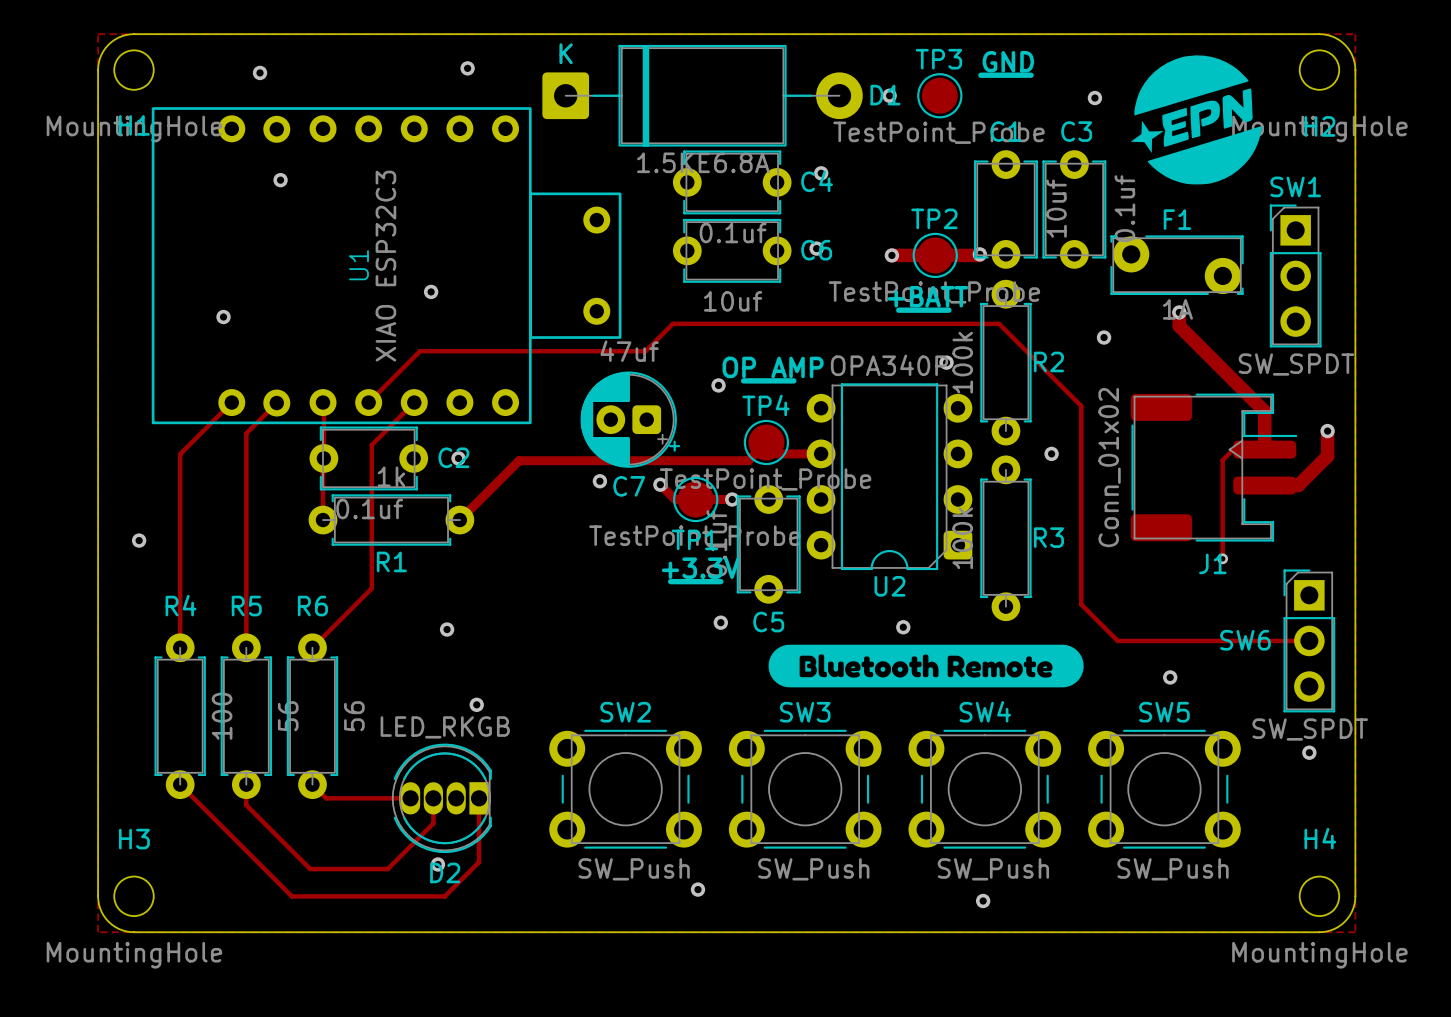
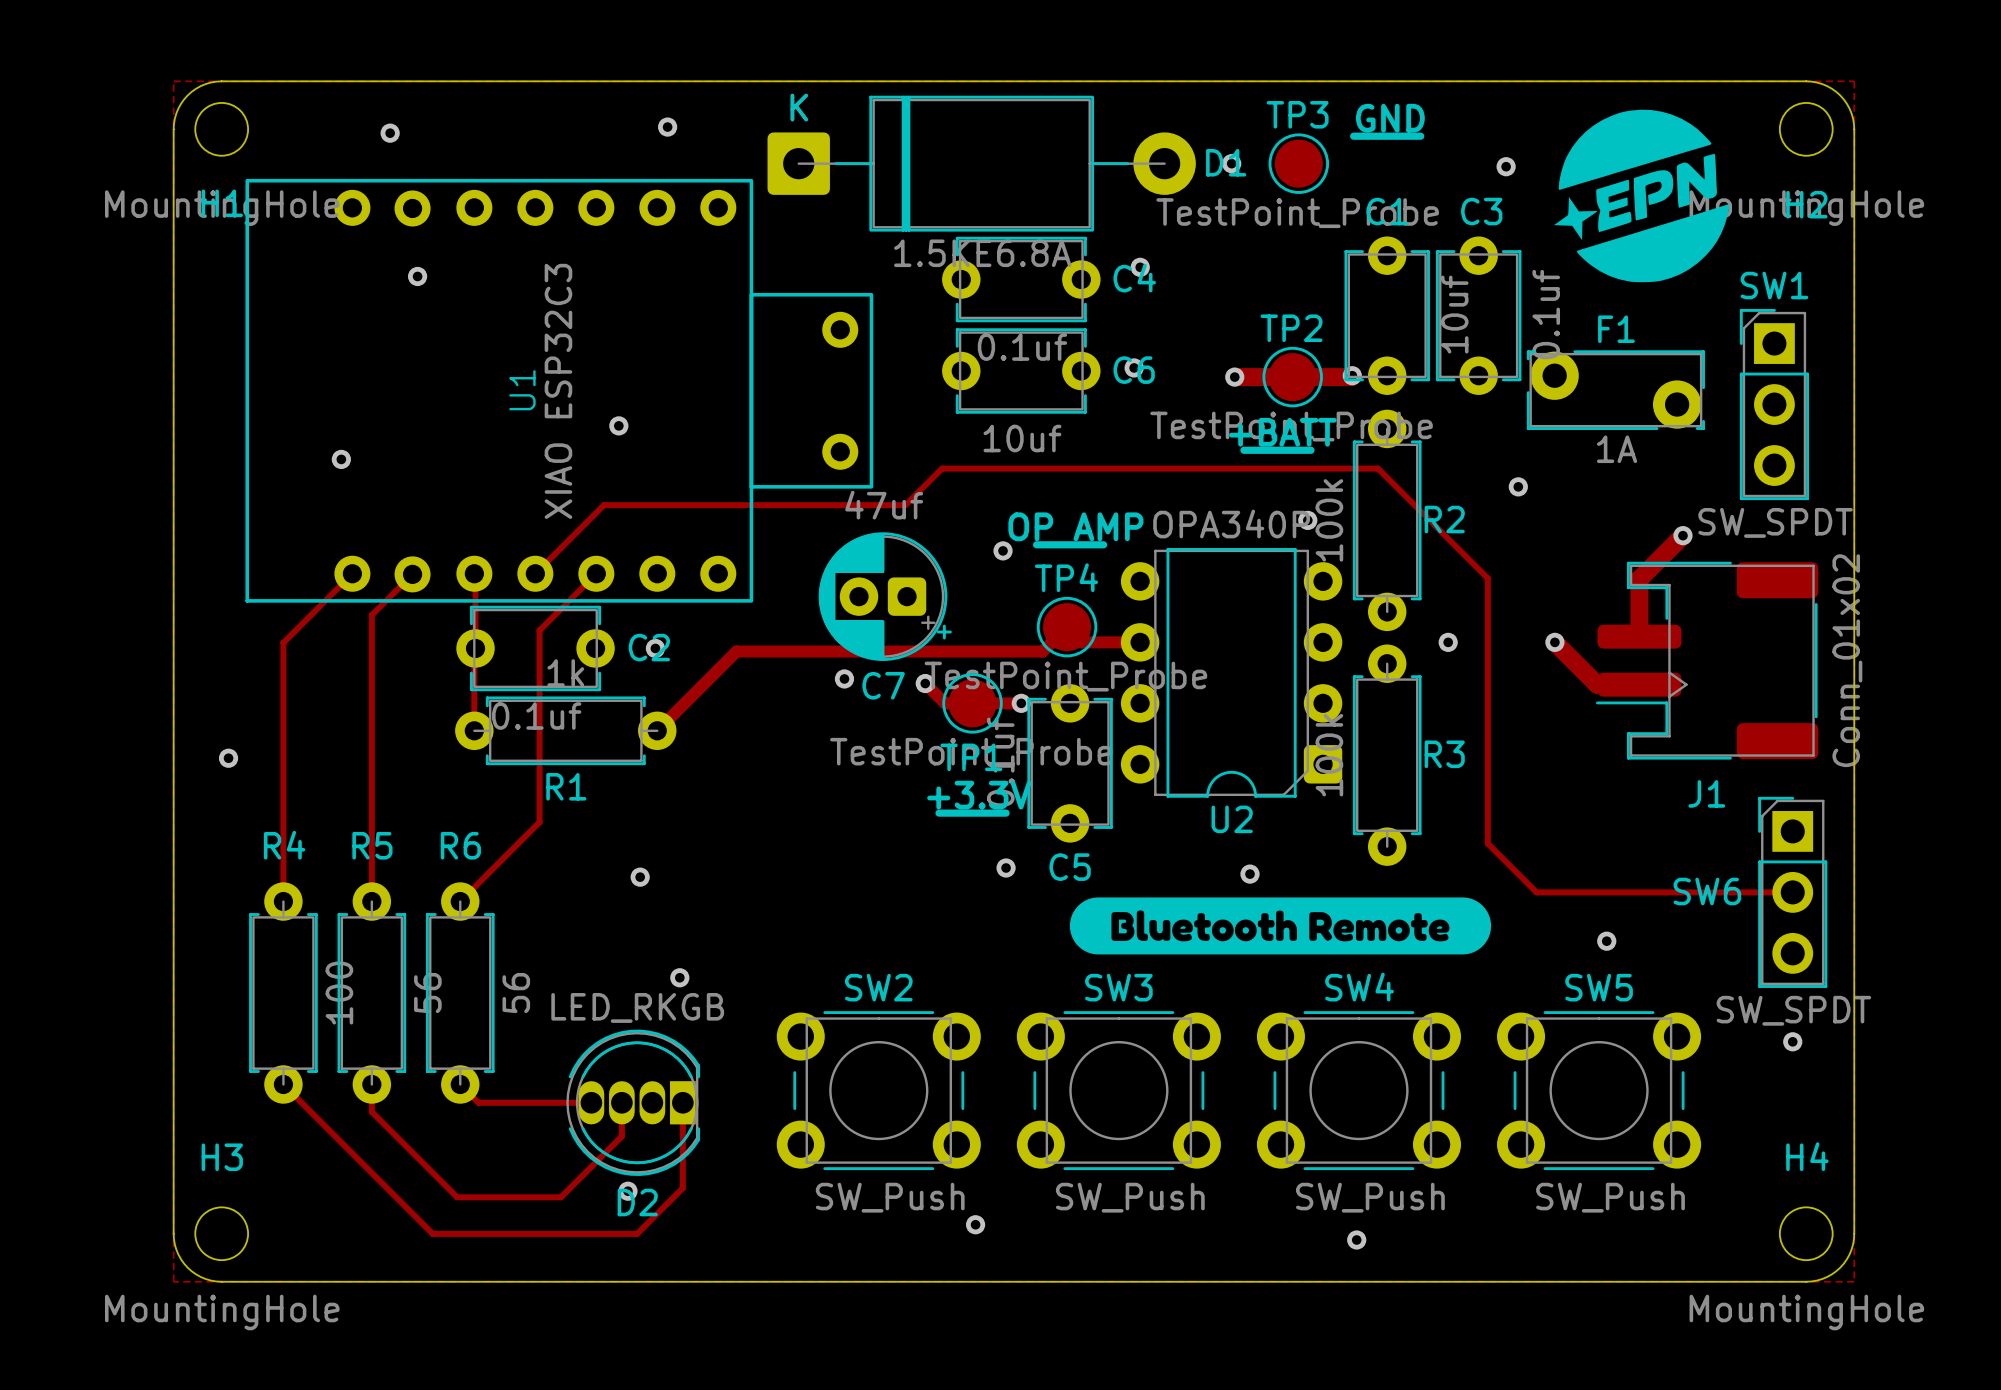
track: (1179, 312) (1179, 326) (1264, 411) (1264, 449) (1233, 449) (1222, 460) (1222, 558) -> none
via: (1179, 312) -> none
track: none -> (1682, 535) (1639, 579) (1639, 636)
via: none -> (1682, 535)
track: (1327, 431) (1327, 456) (1298, 485) (1264, 485) -> none
via: (1327, 431) -> none
track: none -> (1554, 642) (1597, 684) (1639, 684)
via: none -> (1554, 642)
J1 rotation: 0° (1214, 467) -> 180° (1707, 660)
via: (1222, 558) -> none

